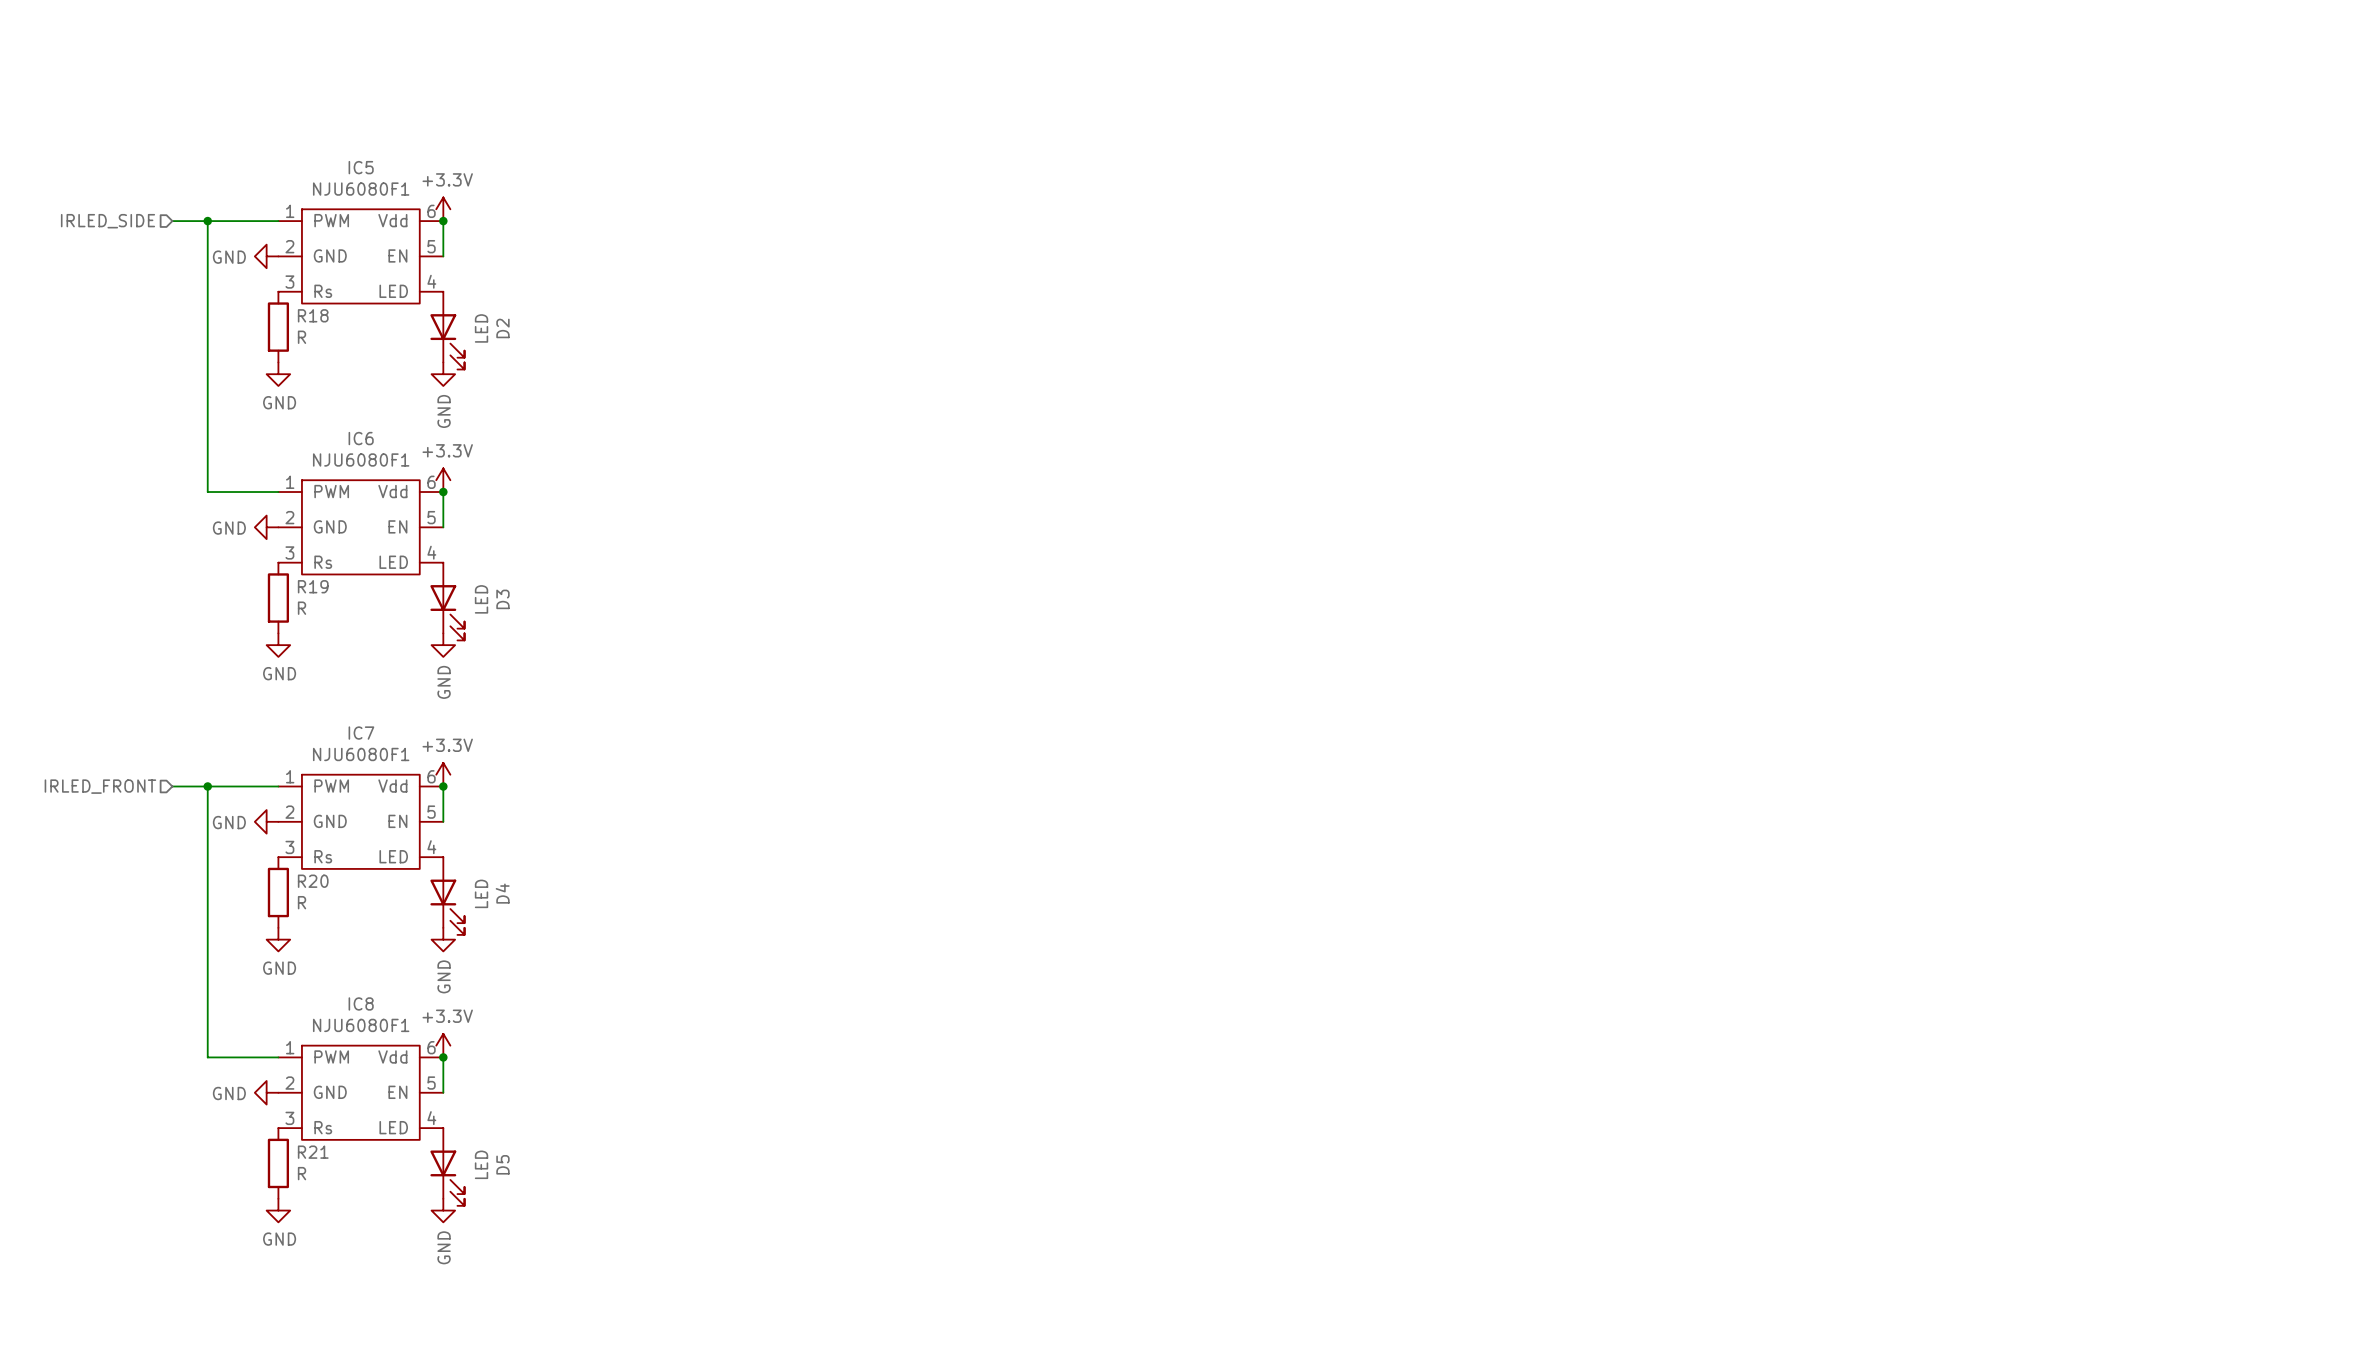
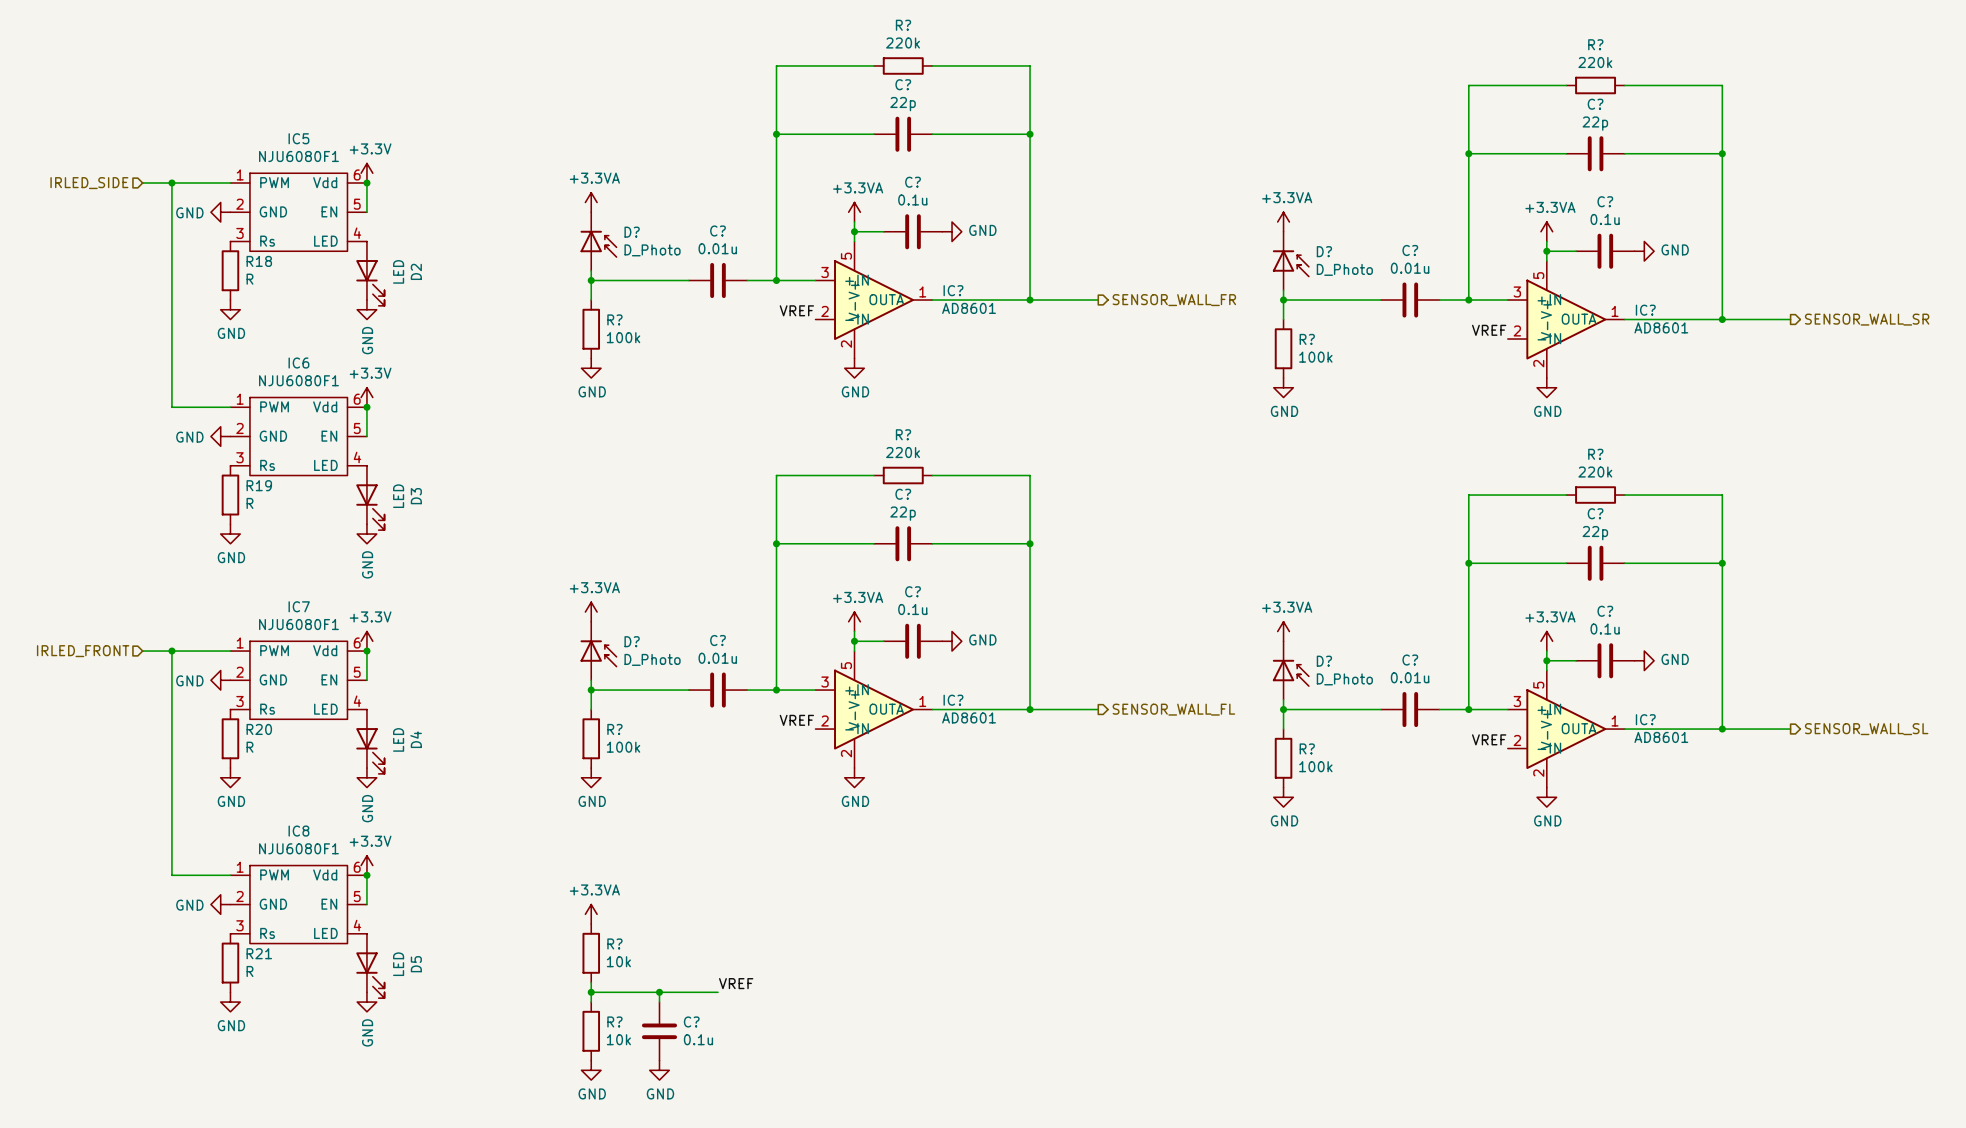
wire: none -> (874, 65) (776, 65) (776, 280)
R?: none -> 220k (903, 65)
wire: none -> (932, 65) (1030, 65) (1030, 300)
wire: none -> (1566, 85) (1468, 85) (1468, 300)
R?: none -> 220k (1595, 85)
wire: none -> (1624, 85) (1722, 85) (1722, 319)
wire: none -> (776, 134) (874, 134)
junction: none -> (776, 134)
C?: none -> 22p (903, 134)
wire: none -> (932, 134) (1030, 134)
junction: none -> (1030, 134)
wire: none -> (1468, 153) (1566, 153)
junction: none -> (1468, 153)
C?: none -> 22p (1595, 153)
wire: none -> (1624, 153) (1722, 153)
junction: none -> (1722, 153)
power symbol: none -> +3.3VA (591, 202)
power symbol: none -> +3.3VA (854, 212)
wire: none -> (854, 222) (854, 241)
power symbol: none -> +3.3VA (1283, 222)
wire: none -> (854, 231) (883, 231)
junction: none -> (854, 231)
C?: none -> 0.1u (913, 231)
power symbol: none -> GND (952, 231)
power symbol: none -> +3.3VA (1546, 231)
D?: none -> D_Photo (598, 241)
wire: none -> (1546, 241) (1546, 261)
wire: none -> (1546, 251) (1576, 251)
junction: none -> (1546, 251)
C?: none -> 0.1u (1605, 251)
power symbol: none -> GND (1644, 251)
D?: none -> D_Photo (1290, 261)
wire: none -> (591, 270) (591, 300)
wire: none -> (591, 280) (688, 280)
junction: none -> (591, 280)
C?: none -> 0.01u (718, 280)
wire: none -> (747, 280) (815, 280)
junction: none -> (776, 280)
wire: none -> (1283, 290) (1283, 319)
IC?: none -> AD8601 (874, 300)
wire: none -> (932, 300) (1098, 300)
junction: none -> (1030, 300)
hierarchical label: none -> SENSOR_WALL_FR (1174, 300)
wire: none -> (1283, 300) (1381, 300)
junction: none -> (1283, 300)
C?: none -> 0.01u (1410, 300)
wire: none -> (1439, 300) (1507, 300)
junction: none -> (1468, 300)
label: none -> VREF (796, 310)
IC?: none -> AD8601 (1566, 319)
wire: none -> (1624, 319) (1790, 319)
junction: none -> (1722, 319)
hierarchical label: none -> SENSOR_WALL_SR (1867, 319)
R?: none -> 100k (591, 329)
label: none -> VREF (1489, 330)
R?: none -> 100k (1283, 348)
power symbol: none -> GND (591, 368)
power symbol: none -> GND (854, 368)
power symbol: none -> GND (1283, 387)
power symbol: none -> GND (1546, 387)
wire: none -> (874, 475) (776, 475) (776, 690)
R?: none -> 220k (903, 475)
wire: none -> (932, 475) (1030, 475) (1030, 709)
wire: none -> (1566, 495) (1468, 495) (1468, 709)
R?: none -> 220k (1595, 495)
wire: none -> (1624, 495) (1722, 495) (1722, 729)
wire: none -> (776, 543) (874, 543)
junction: none -> (776, 543)
C?: none -> 22p (903, 543)
wire: none -> (932, 543) (1030, 543)
junction: none -> (1030, 543)
wire: none -> (1468, 563) (1566, 563)
junction: none -> (1468, 563)
C?: none -> 22p (1595, 563)
wire: none -> (1624, 563) (1722, 563)
junction: none -> (1722, 563)
power symbol: none -> +3.3VA (591, 612)
power symbol: none -> +3.3VA (854, 621)
wire: none -> (854, 631) (854, 651)
power symbol: none -> +3.3VA (1283, 631)
wire: none -> (854, 641) (883, 641)
junction: none -> (854, 641)
C?: none -> 0.1u (913, 641)
power symbol: none -> GND (952, 641)
power symbol: none -> +3.3VA (1546, 641)
D?: none -> D_Photo (598, 651)
wire: none -> (1546, 651) (1546, 670)
wire: none -> (1546, 660) (1576, 660)
junction: none -> (1546, 660)
C?: none -> 0.1u (1605, 660)
power symbol: none -> GND (1644, 660)
D?: none -> D_Photo (1290, 670)
wire: none -> (591, 680) (591, 709)
wire: none -> (591, 690) (688, 690)
junction: none -> (591, 690)
C?: none -> 0.01u (718, 690)
wire: none -> (747, 690) (815, 690)
junction: none -> (776, 690)
wire: none -> (1283, 699) (1283, 729)
IC?: none -> AD8601 (874, 709)
wire: none -> (932, 709) (1098, 709)
junction: none -> (1030, 709)
hierarchical label: none -> SENSOR_WALL_FL (1173, 709)
wire: none -> (1283, 709) (1381, 709)
junction: none -> (1283, 709)
C?: none -> 0.01u (1410, 709)
wire: none -> (1439, 709) (1507, 709)
junction: none -> (1468, 709)
label: none -> VREF (796, 720)
IC?: none -> AD8601 (1566, 729)
wire: none -> (1624, 729) (1790, 729)
junction: none -> (1722, 729)
hierarchical label: none -> SENSOR_WALL_SL (1866, 729)
R?: none -> 100k (591, 738)
label: none -> VREF (1489, 739)
R?: none -> 100k (1283, 758)
power symbol: none -> GND (591, 777)
power symbol: none -> GND (854, 777)
power symbol: none -> GND (1283, 797)
power symbol: none -> GND (1546, 797)
power symbol: none -> +3.3VA (591, 914)
R?: none -> 10k (591, 953)
wire: none -> (591, 982) (591, 1002)
label: none -> VREF (736, 983)
wire: none -> (591, 992) (718, 992)
junction: none -> (591, 992)
wire: none -> (659, 992) (659, 1002)
junction: none -> (659, 992)
R?: none -> 10k (591, 1031)
C?: none -> 0.1u (659, 1031)
power symbol: none -> GND (591, 1070)
power symbol: none -> GND (659, 1070)

